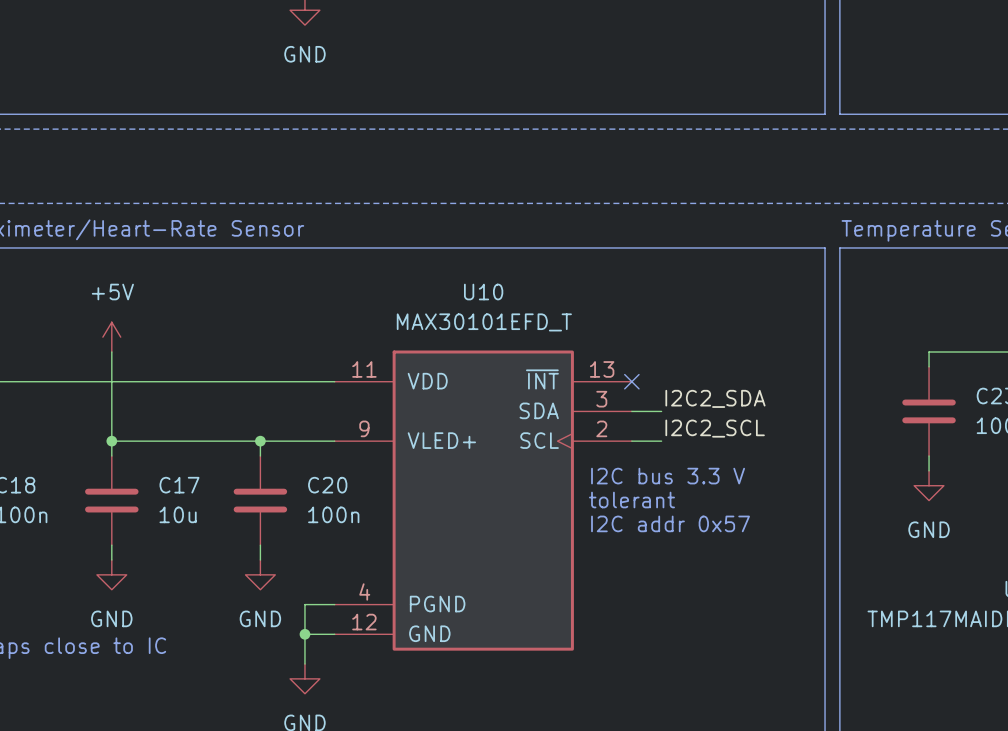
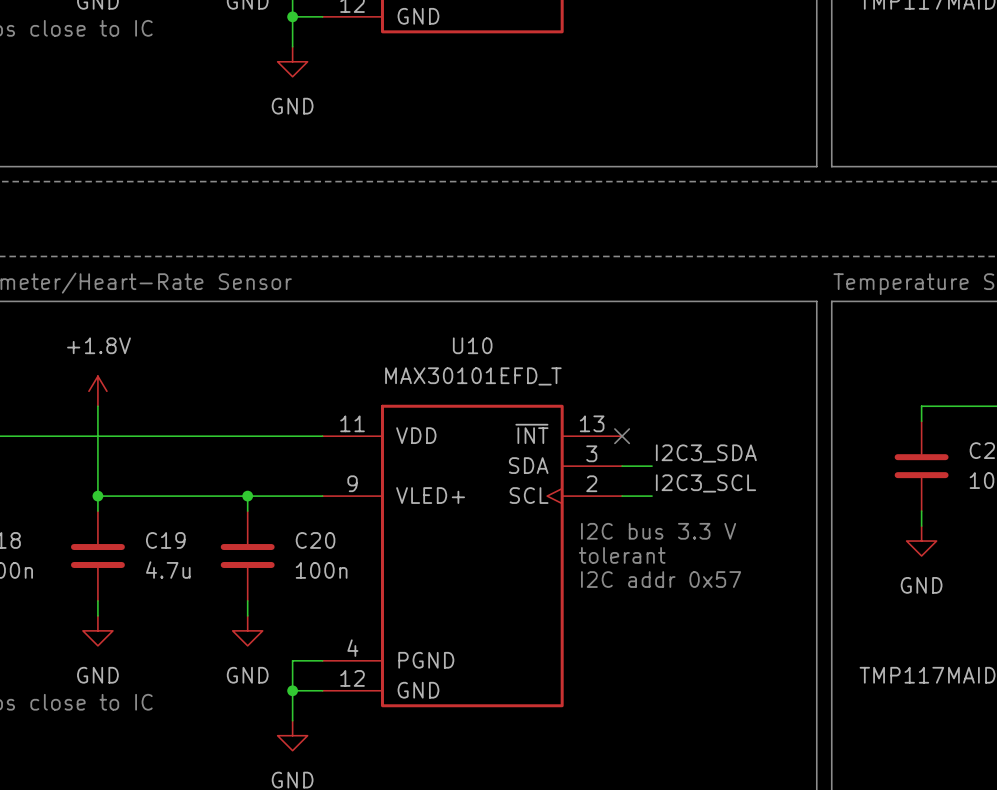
power symbol: +5V (111, 337) -> +1.8V (97, 391)
label: I2C2_SDA (715, 398) -> I2C3_SDA (706, 453)
label: I2C2_SCL (715, 428) -> I2C3_SCL (705, 483)
C17 name: C17 (179, 485) -> C19 (165, 540)
C17 value: 10u (178, 514) -> 4.7u (168, 570)

